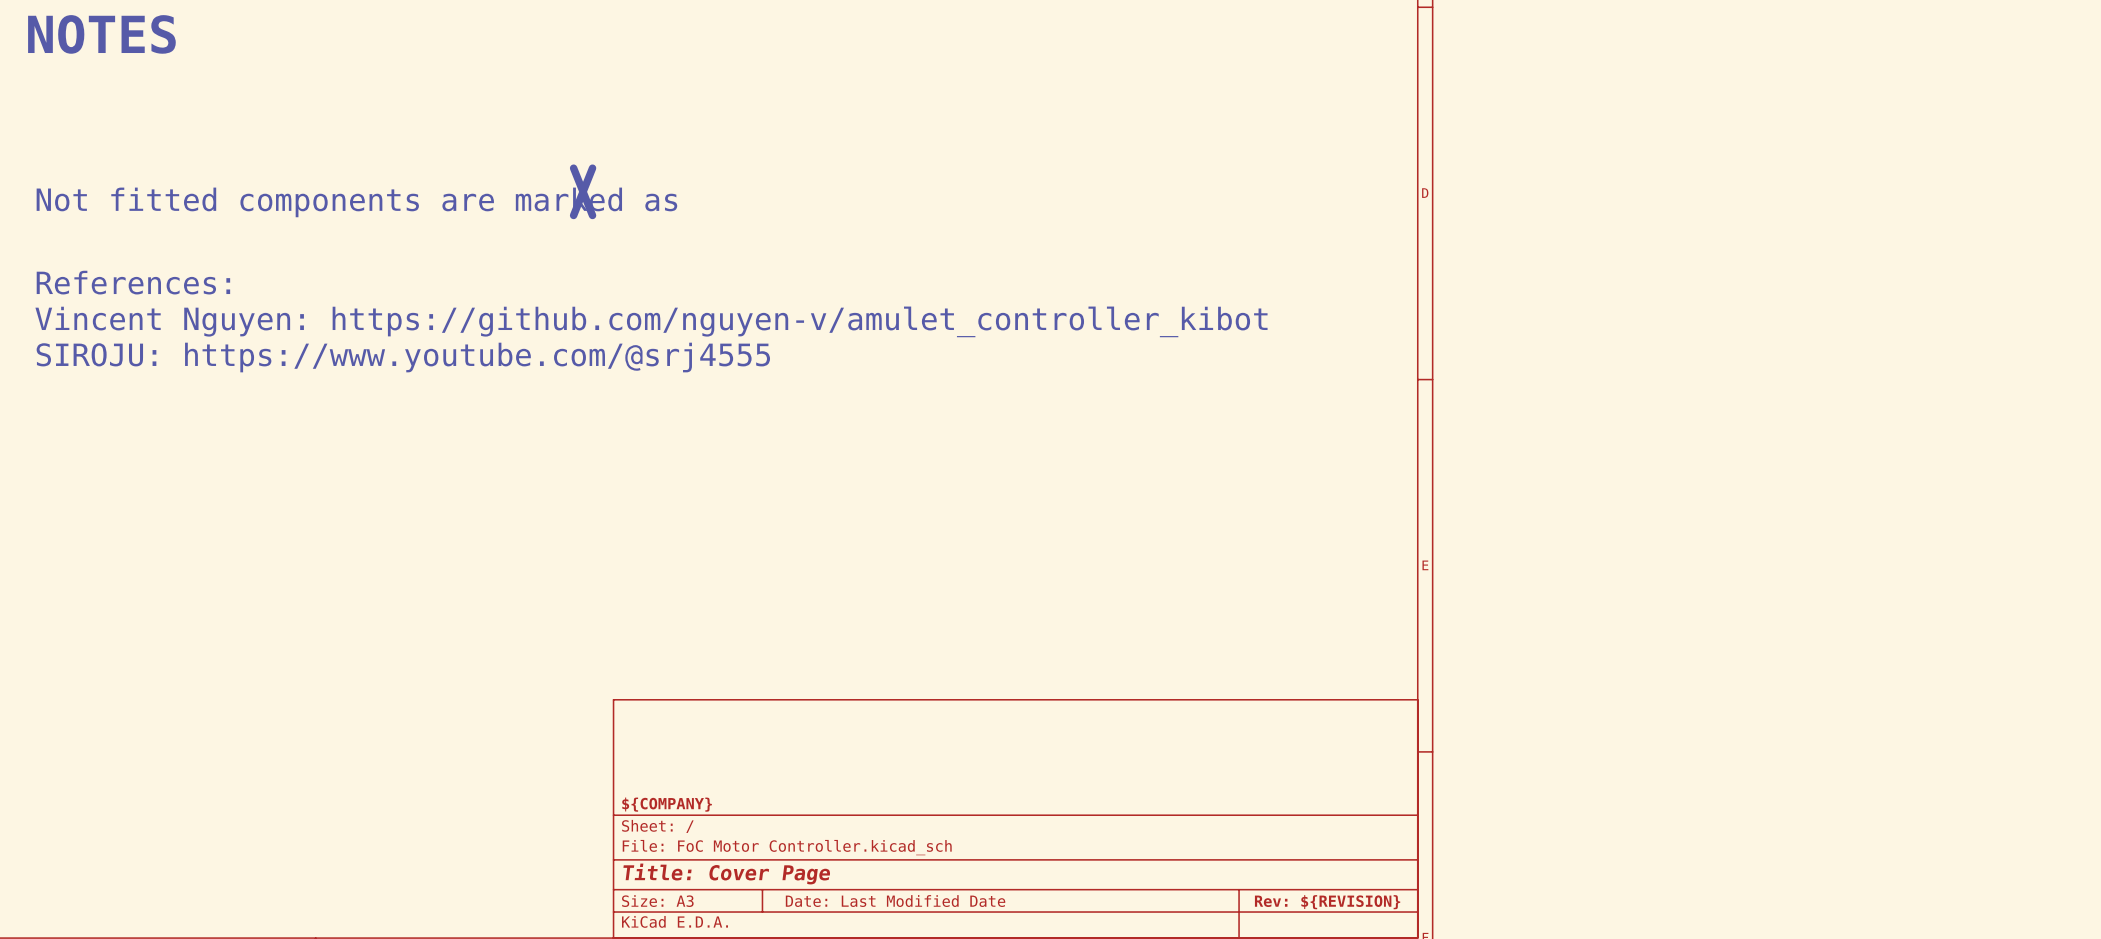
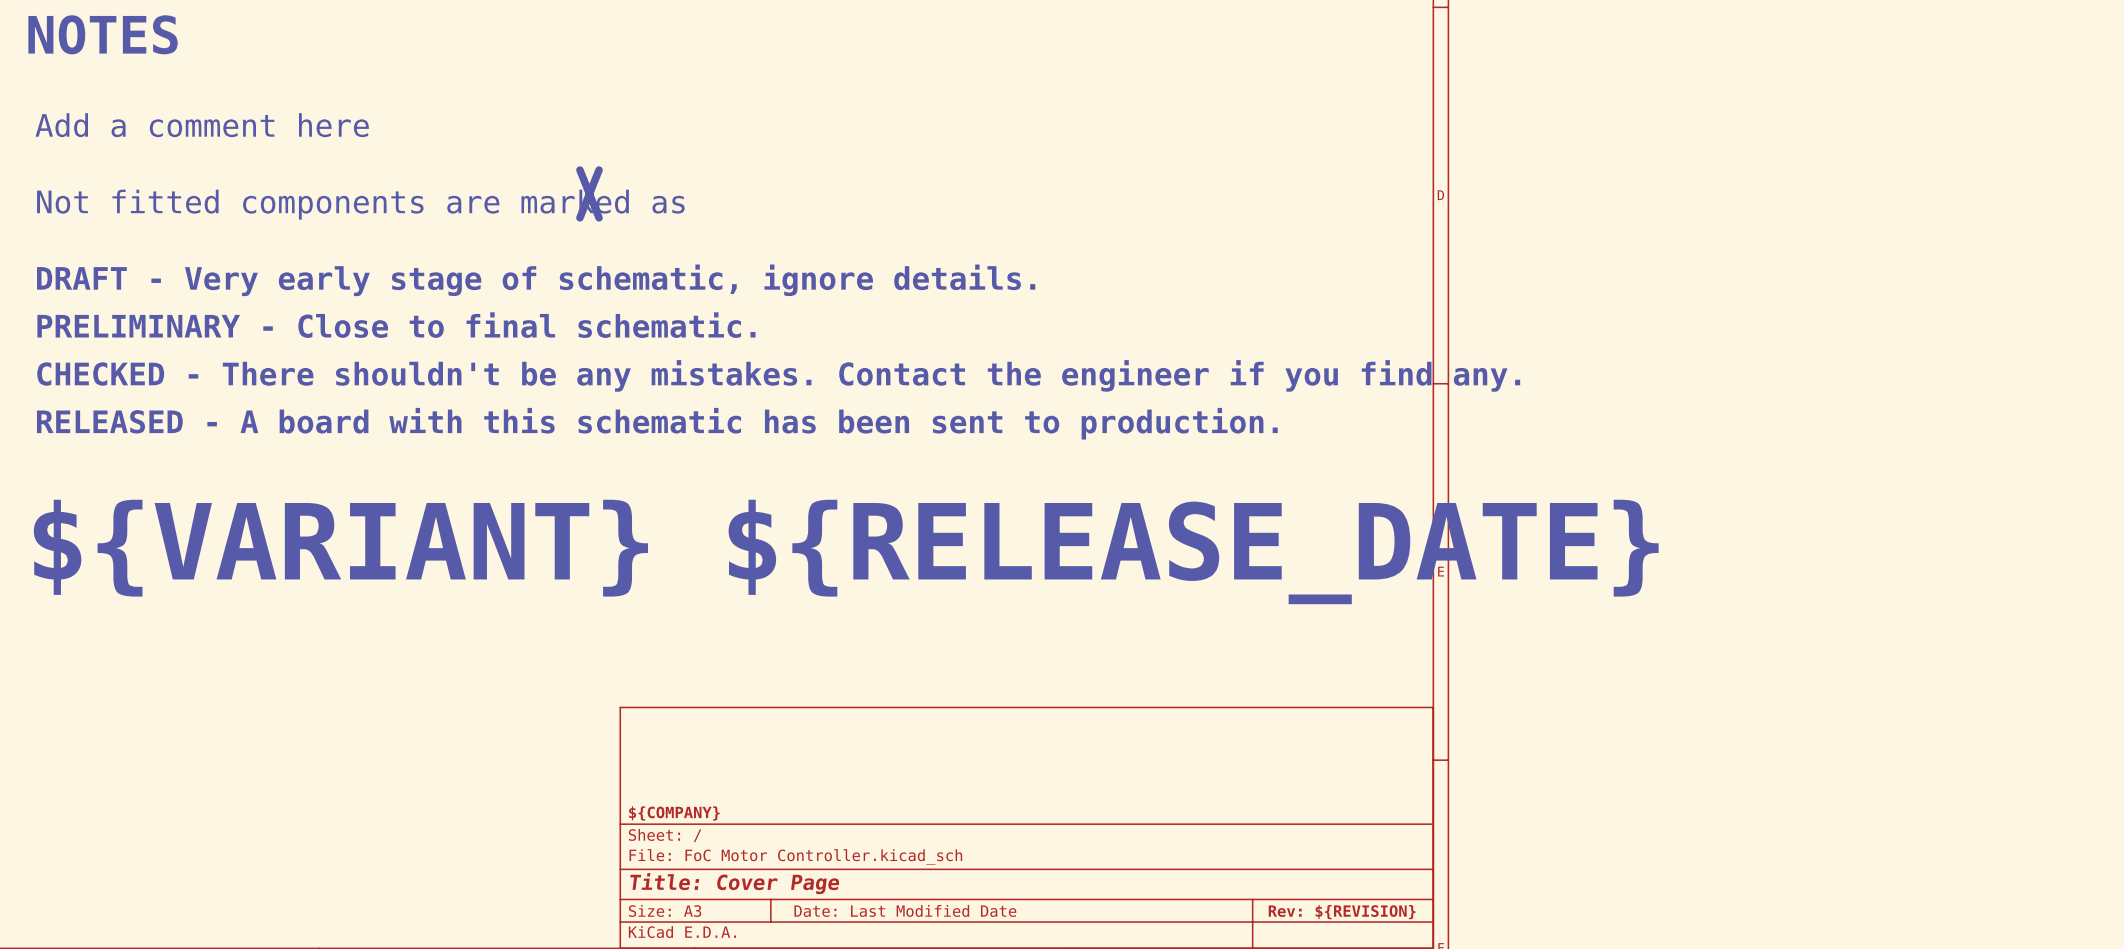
text: none -> Add a comment here (202, 125)
text: none -> DRAFT - Very early stage of schematic, ignore details. (536, 280)
text: References: (133, 282) -> none
text: Vincent Nguyen: https://github.com/nguyen-v/amulet_controller_kibot (651, 321) -> PRELIMINARY - Close to final schematic. (396, 325)
text: SIROJU: https://www.youtube.com/@srj4555 (403, 357) -> none
text: none -> CHECKED - There shouldn't be any mistakes. Contact the engineer if you find any. (778, 375)
text: none -> RELEASED - A board with this schematic has been sent to production. (657, 423)
text: none -> ${VARIANT} ${RELEASE_DATE} (846, 551)

